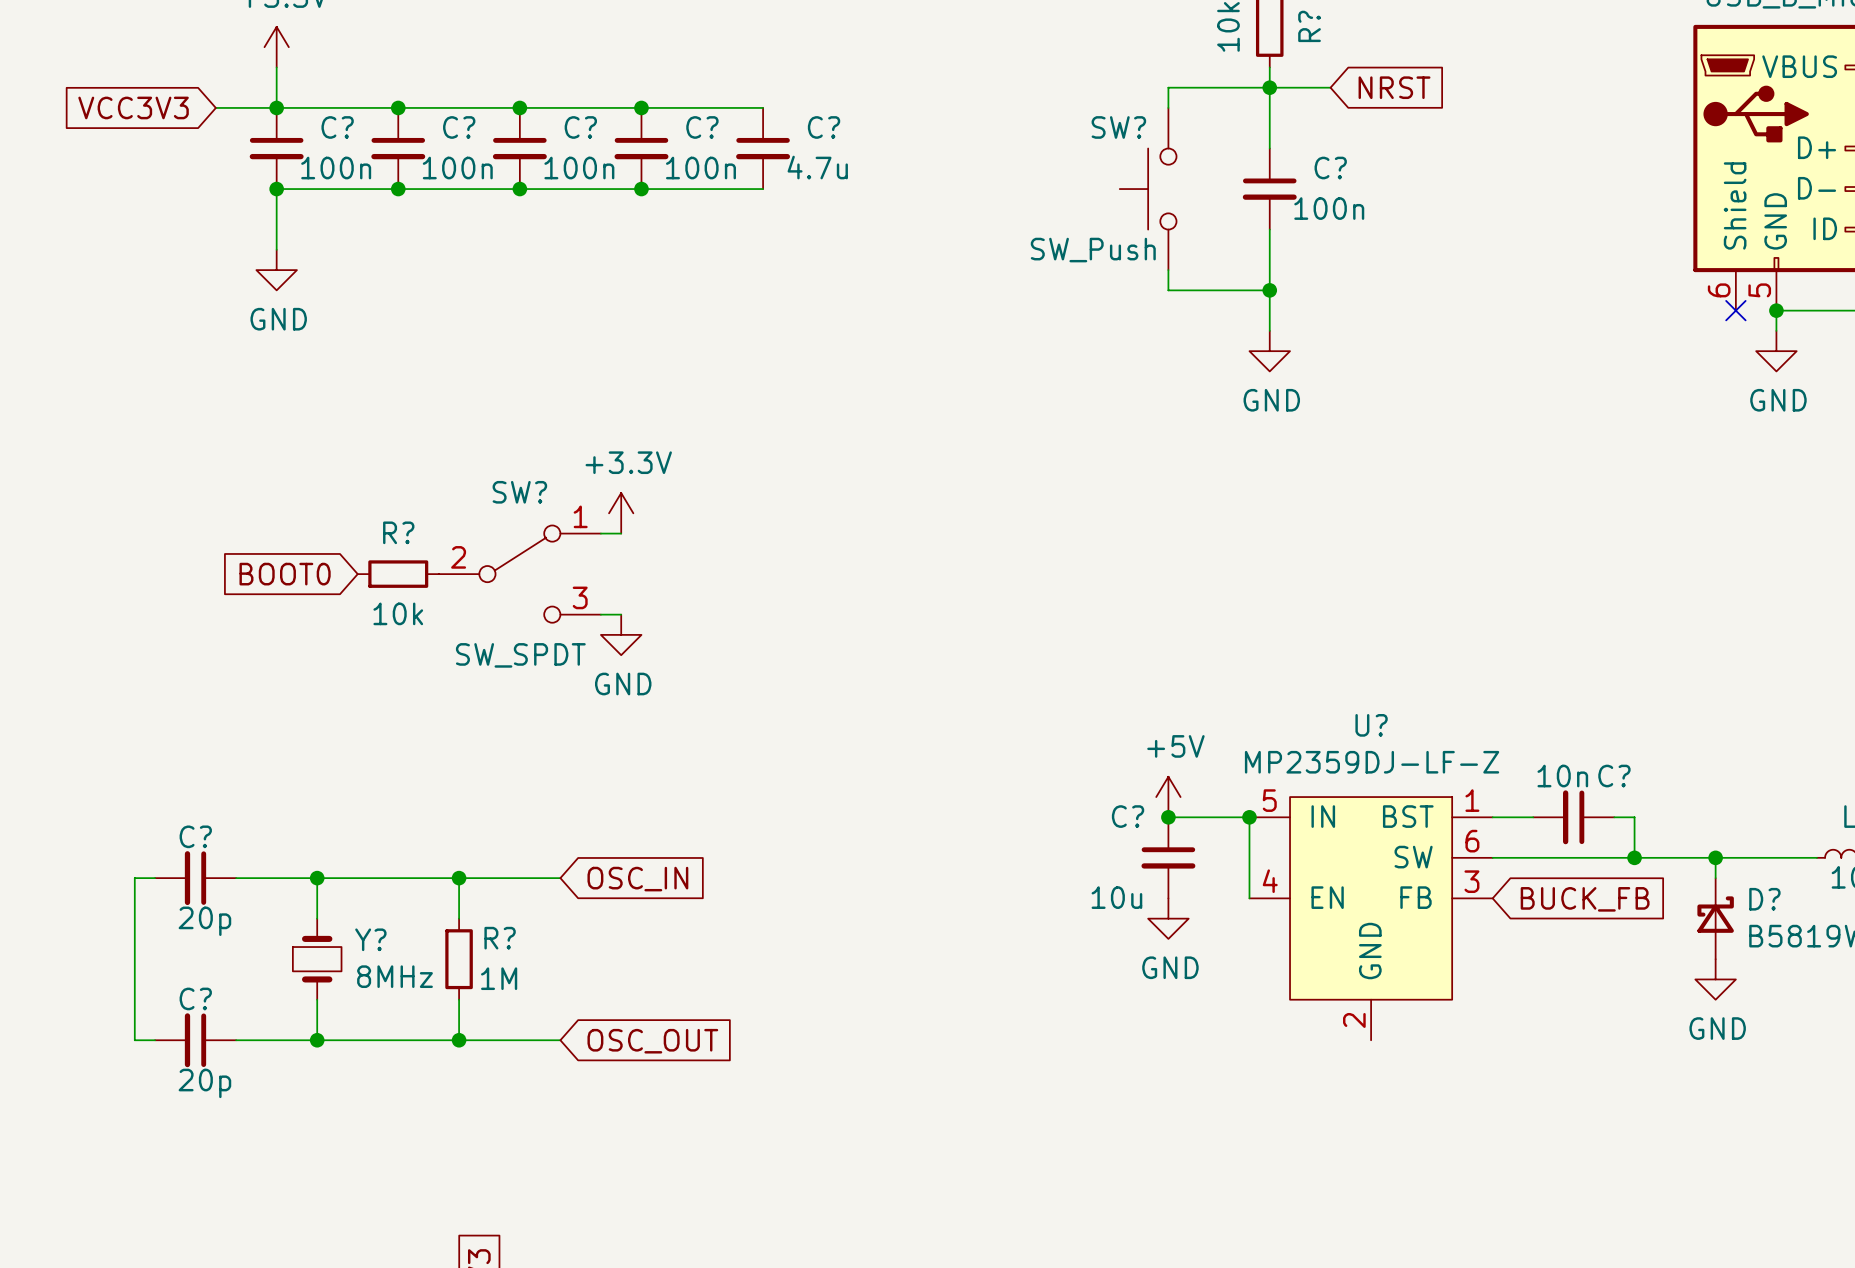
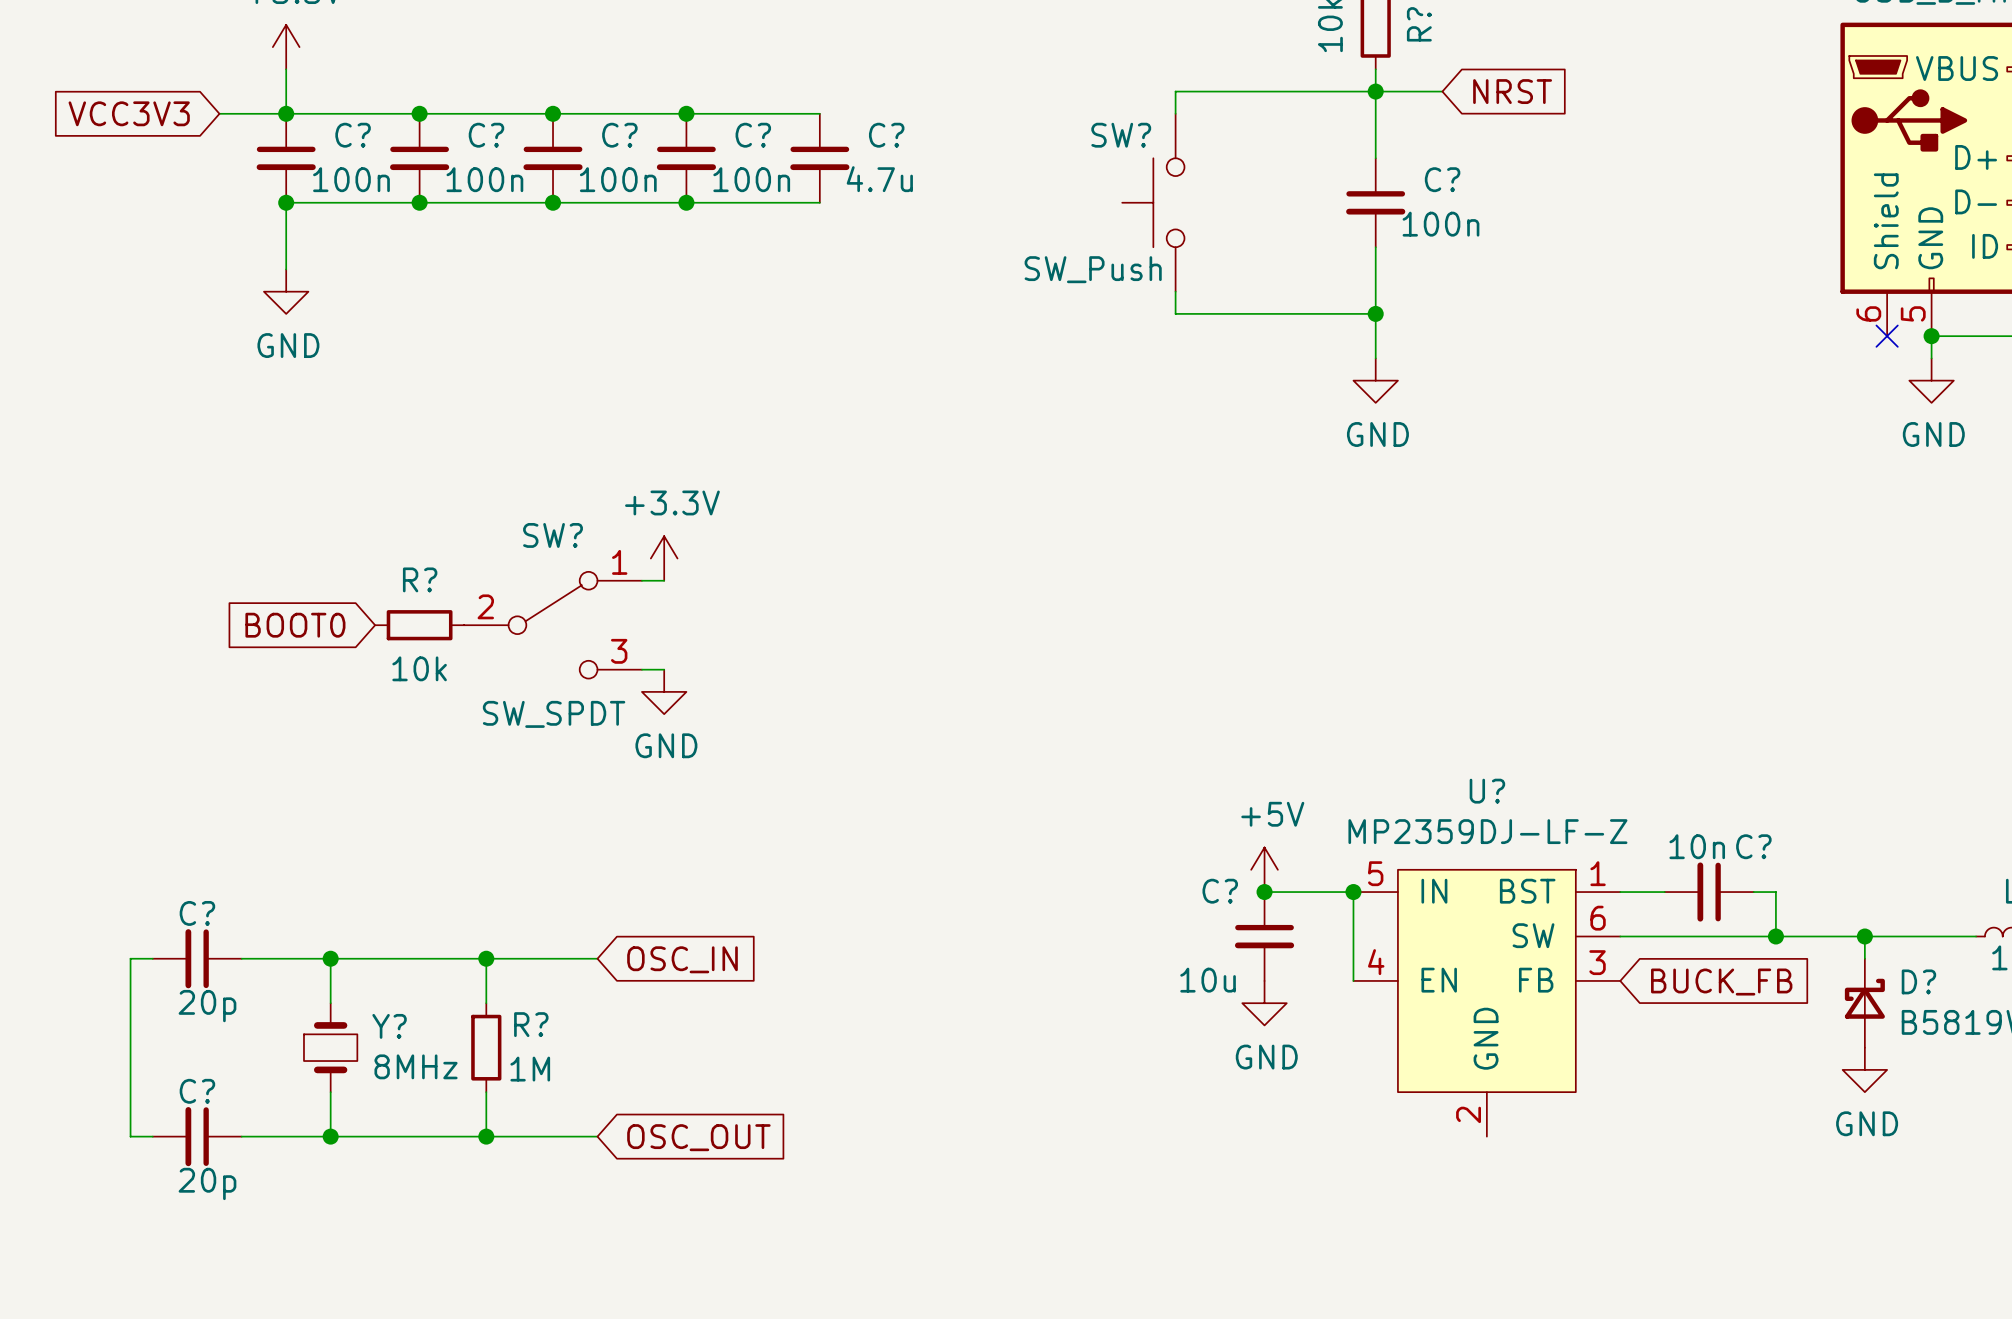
wire: (1168, 87) (1168, 107) -> (1264, 91) (1175, 91) (1175, 113)
SW? position: (1148, 189) -> (1153, 202)
wire: (1168, 270) (1168, 290) -> (1175, 291) (1175, 313) (1264, 313)

